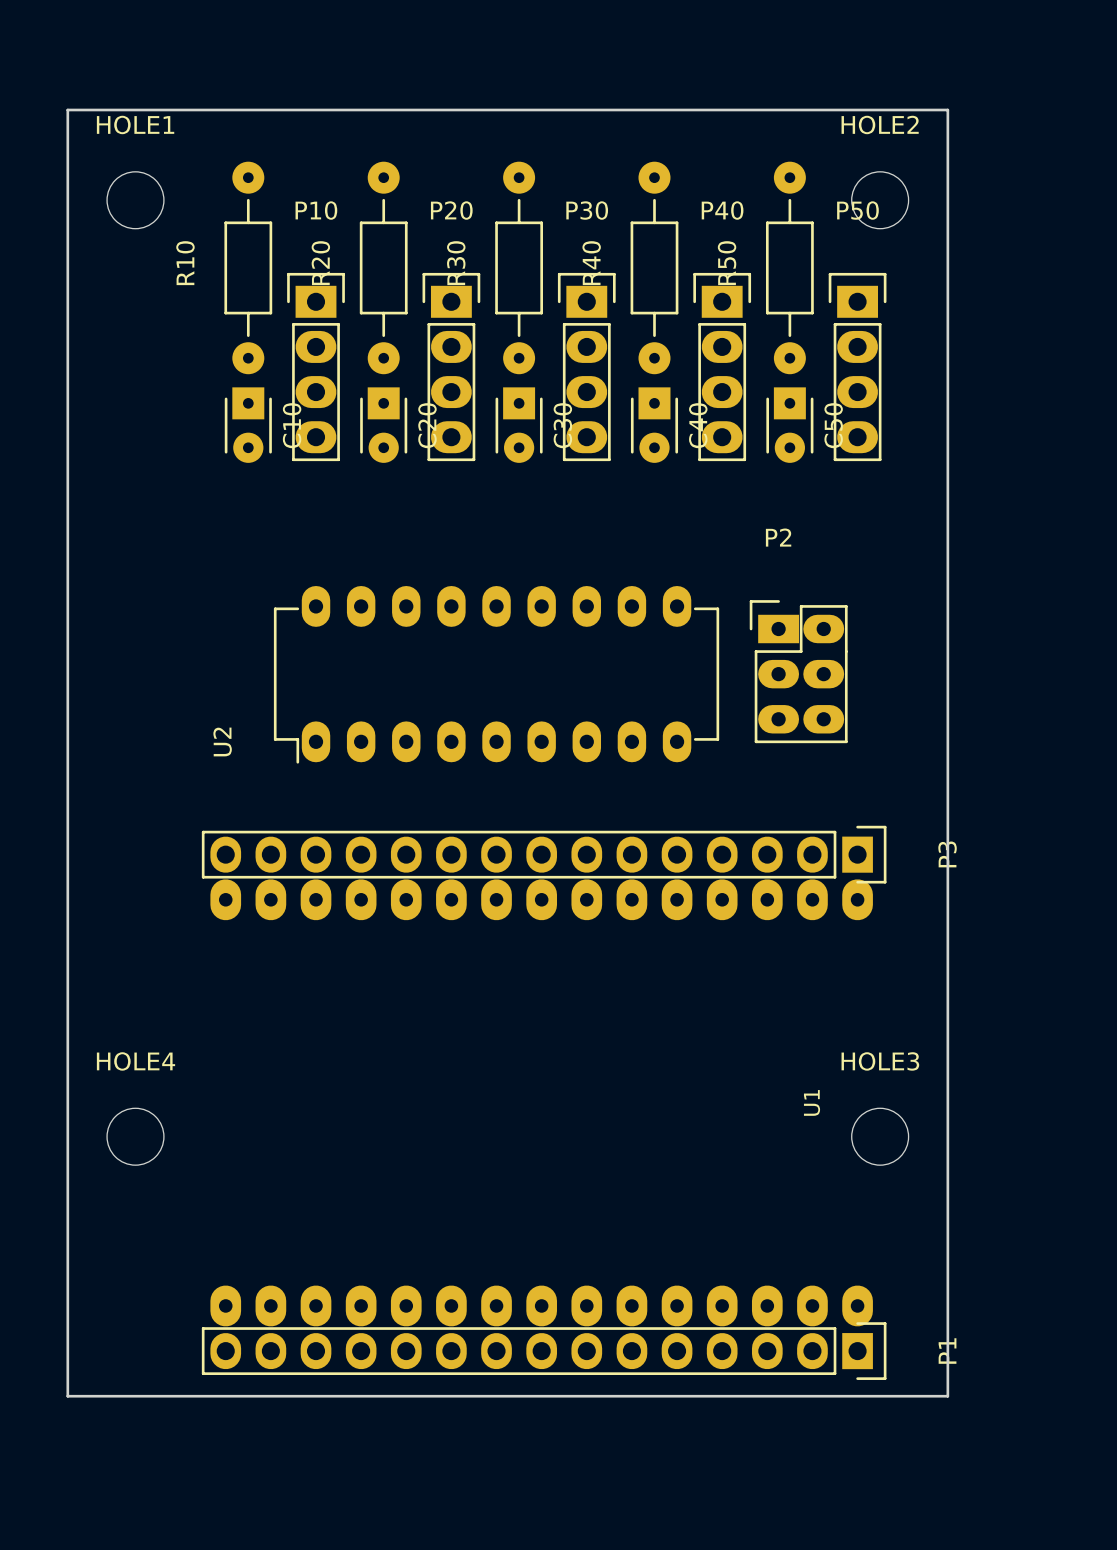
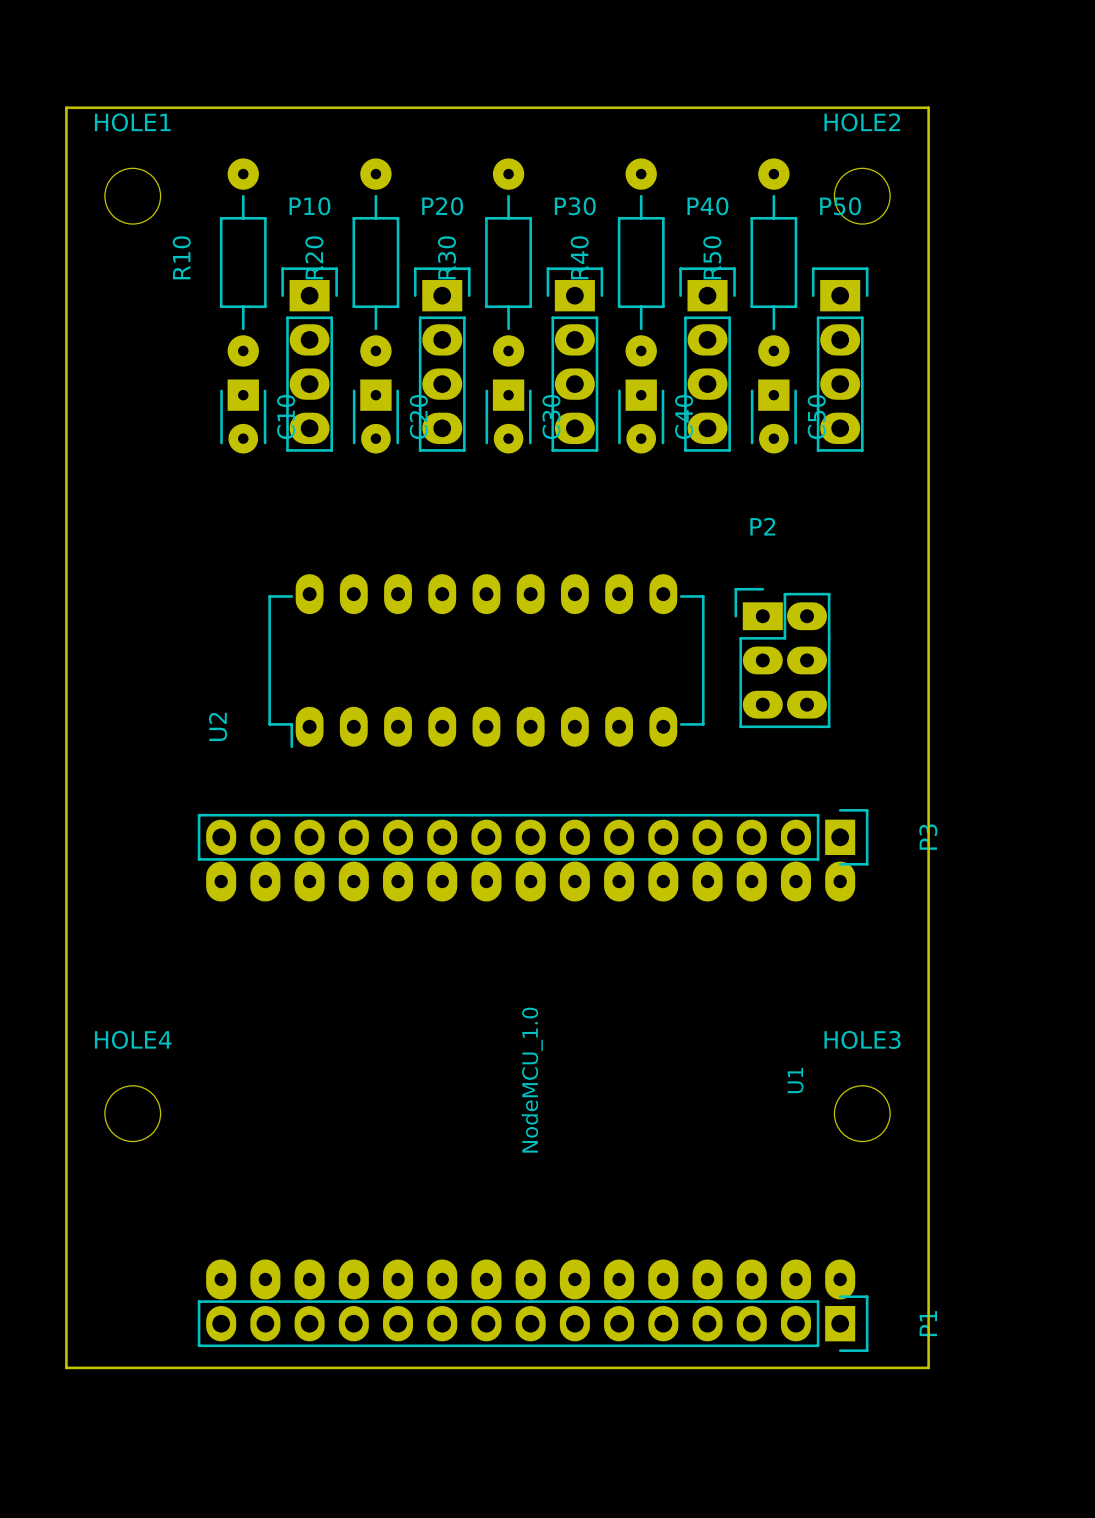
U1 value: none -> NodeMCU_1.0 (532, 1080)

